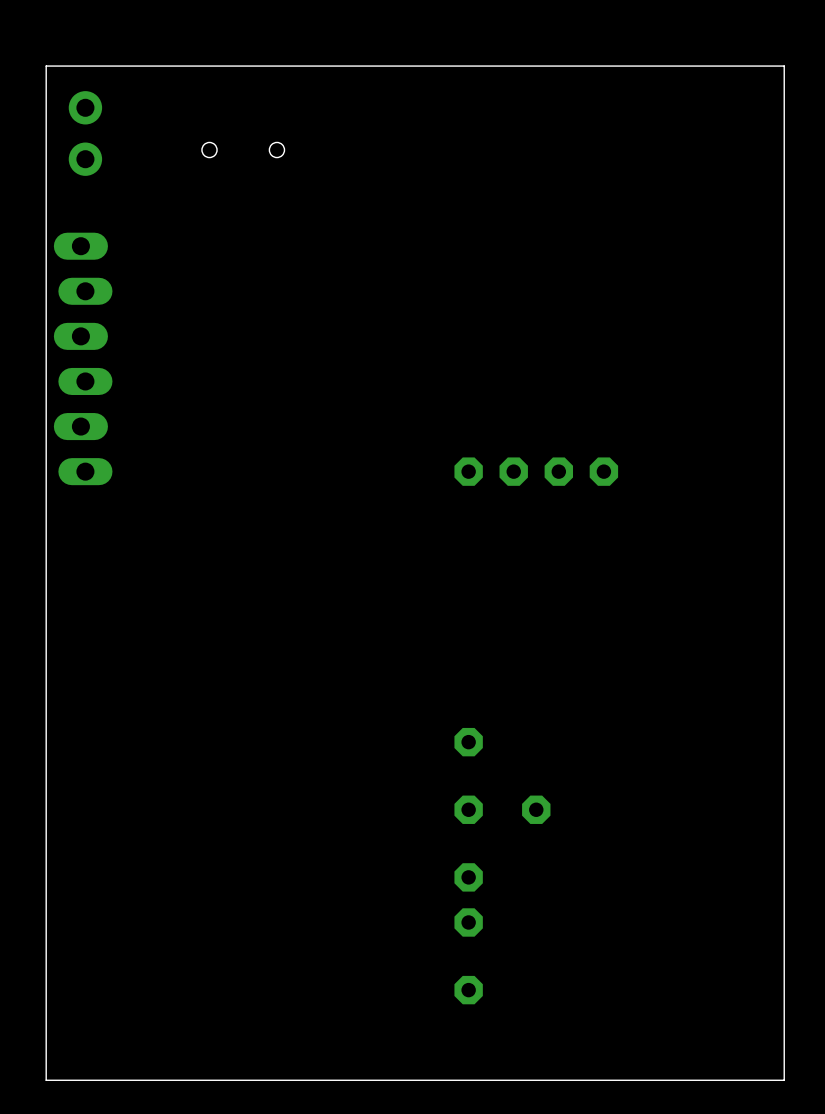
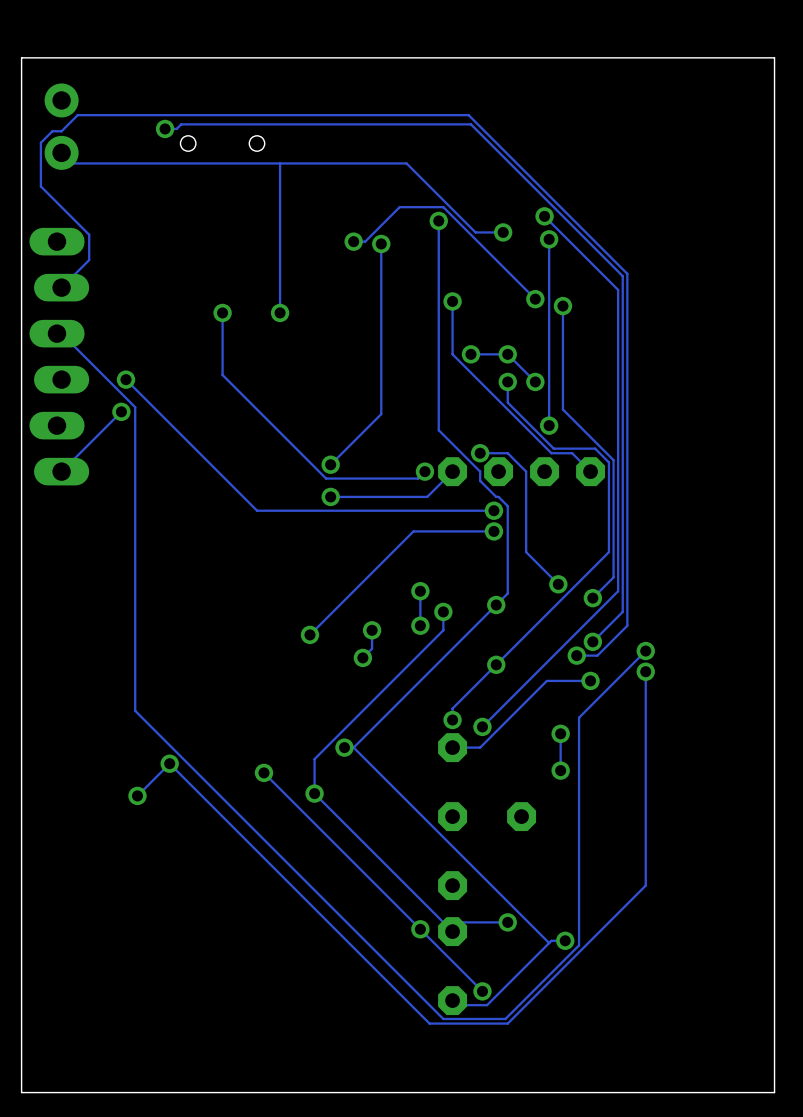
track: none -> (165, 128) (176, 128) (181, 124) (470, 124) (622, 276) (622, 611) (592, 641)
via: none -> (165, 128)
track: none -> (61, 152) (70, 163) (406, 163) (475, 232) (503, 232)
track: none -> (280, 163) (280, 312)
track: none -> (544, 216) (618, 289) (618, 591) (482, 726)
via: none -> (544, 216)
track: none -> (438, 220) (438, 430) (480, 471) (480, 480) (507, 506) (507, 593) (353, 747)
via: none -> (438, 220)
via: none -> (503, 232)
track: none -> (549, 239) (549, 425)
via: none -> (549, 239)
track: none -> (353, 241) (365, 241) (399, 207) (443, 207) (535, 299)
via: none -> (353, 241)
track: none -> (381, 243) (381, 414) (330, 464)
via: none -> (381, 243)
track: none -> (61, 287) (89, 260) (89, 234) (40, 186) (40, 142) (52, 131) (61, 131) (77, 115) (468, 115) (627, 273) (627, 625) (597, 655) (576, 655)
via: none -> (535, 299)
track: none -> (452, 301) (452, 354) (551, 453) (572, 453) (590, 471)
via: none -> (452, 301)
track: none -> (562, 306) (562, 409) (613, 460) (613, 577) (592, 598)
via: none -> (562, 306)
track: none -> (222, 312) (222, 375) (326, 478) (418, 478) (424, 471)
via: none -> (222, 312)
via: none -> (280, 312)
track: none -> (57, 333) (61, 333) (135, 407) (135, 710) (443, 1018) (505, 1018) (579, 945) (579, 717) (645, 651)
track: none -> (470, 354) (507, 354) (535, 381)
via: none -> (470, 354)
via: none -> (507, 354)
track: none -> (126, 379) (257, 510) (493, 510)
via: none -> (126, 379)
track: none -> (507, 381) (507, 402) (553, 448) (595, 448) (608, 462) (608, 552) (452, 708) (452, 720)
via: none -> (507, 381)
via: none -> (535, 381)
track: none -> (121, 411) (61, 471)
via: none -> (121, 411)
via: none -> (549, 425)
track: none -> (480, 453) (507, 453) (526, 471) (526, 552) (558, 584)
via: none -> (480, 453)
via: none -> (330, 464)
via: none -> (424, 471)
track: none -> (452, 471) (427, 496) (330, 496)
via: none -> (330, 496)
via: none -> (493, 510)
track: none -> (493, 531) (413, 531) (309, 634)
via: none -> (493, 531)
via: none -> (558, 584)
track: none -> (420, 591) (420, 625)
via: none -> (420, 591)
via: none -> (592, 598)
via: none -> (496, 605)
track: none -> (443, 611) (443, 630) (314, 759) (314, 793) (452, 931) (461, 922) (507, 922)
via: none -> (443, 611)
via: none -> (420, 625)
track: none -> (372, 630) (372, 648) (362, 657)
via: none -> (372, 630)
via: none -> (309, 634)
via: none -> (592, 641)
via: none -> (645, 651)
via: none -> (576, 655)
via: none -> (362, 657)
via: none -> (496, 664)
track: none -> (645, 671) (645, 885) (507, 1023) (429, 1023) (169, 763) (137, 795)
via: none -> (645, 671)
track: none -> (590, 680) (546, 680) (480, 747) (452, 747)
via: none -> (590, 680)
via: none -> (452, 720)
via: none -> (482, 726)
track: none -> (560, 733) (560, 770)
via: none -> (560, 733)
via: none -> (344, 747)
track: none -> (353, 747) (549, 943)
via: none -> (169, 763)
via: none -> (560, 770)
track: none -> (263, 772) (482, 991)
via: none -> (263, 772)
via: none -> (314, 793)
via: none -> (137, 795)
via: none -> (507, 922)
via: none -> (420, 929)
track: none -> (565, 940) (551, 940) (487, 1005) (457, 1005) (452, 1000)
via: none -> (565, 940)
via: none -> (482, 991)

